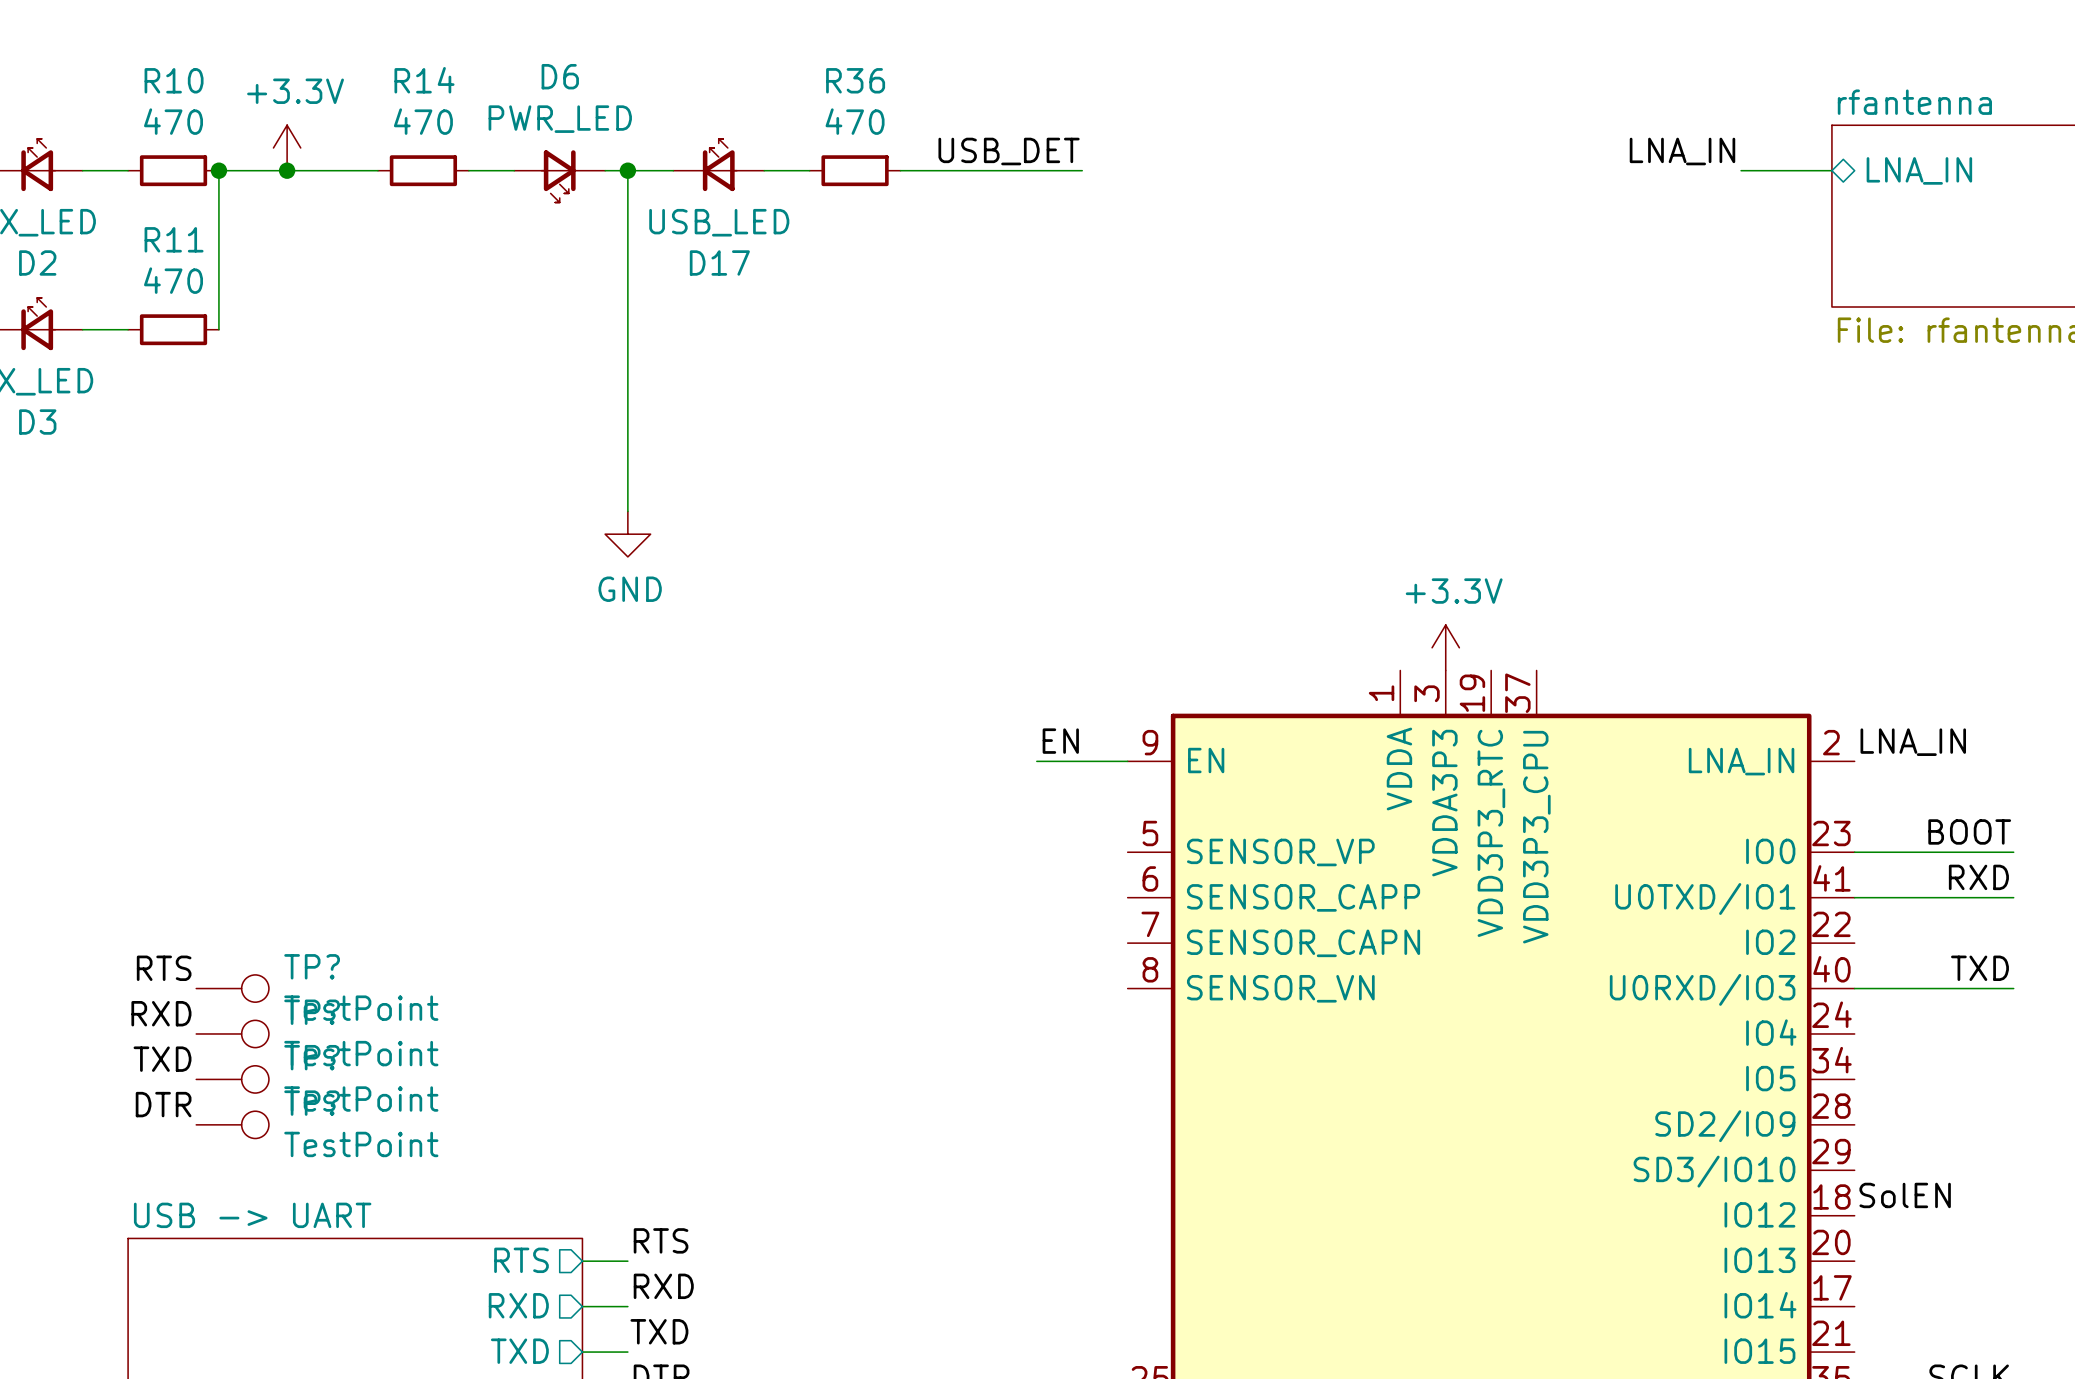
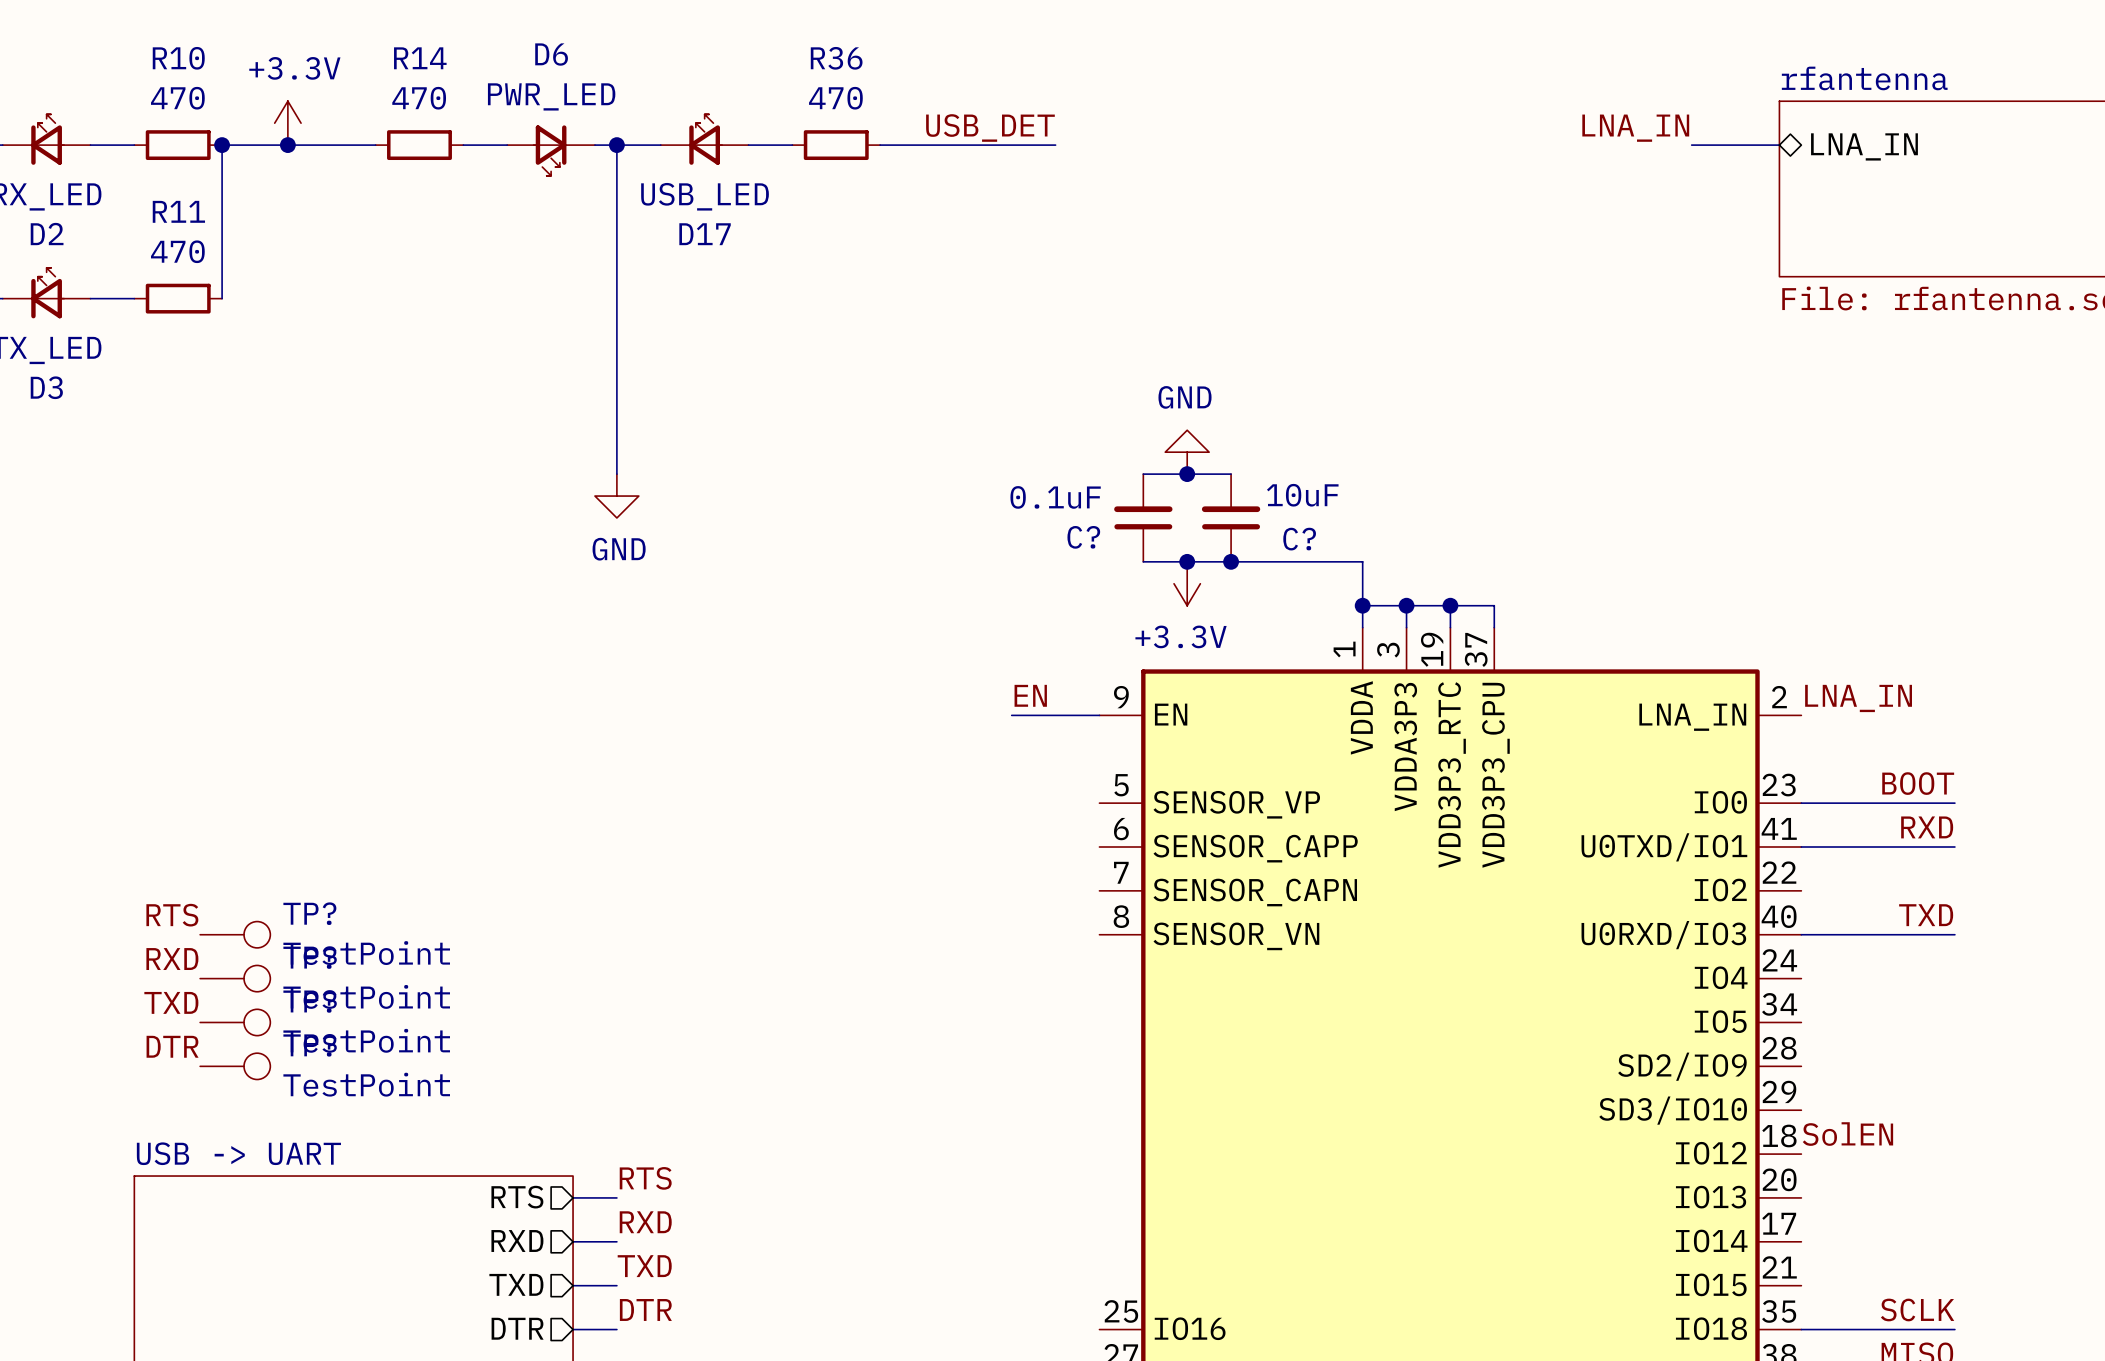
power symbol: none -> GND (1187, 452)
wire: none -> (1143, 474) (1231, 474)
junction: none -> (1187, 474)
C?: none -> 0.1uF (1143, 517)
C?: none -> 10uF (1231, 517)
wire: none -> (1143, 561) (1362, 561) (1362, 627)
junction: none -> (1187, 561)
junction: none -> (1231, 561)
wire: none -> (1362, 605) (1494, 605) (1494, 627)
junction: none -> (1362, 605)
power symbol rotation: 0° (1445, 647) -> 180° (1187, 583)
power symbol position: +3.3V (1445, 647) -> +3.3V (1187, 583)
junction: none -> (1406, 605)
wire: none -> (1450, 605) (1450, 627)
junction: none -> (1450, 605)

